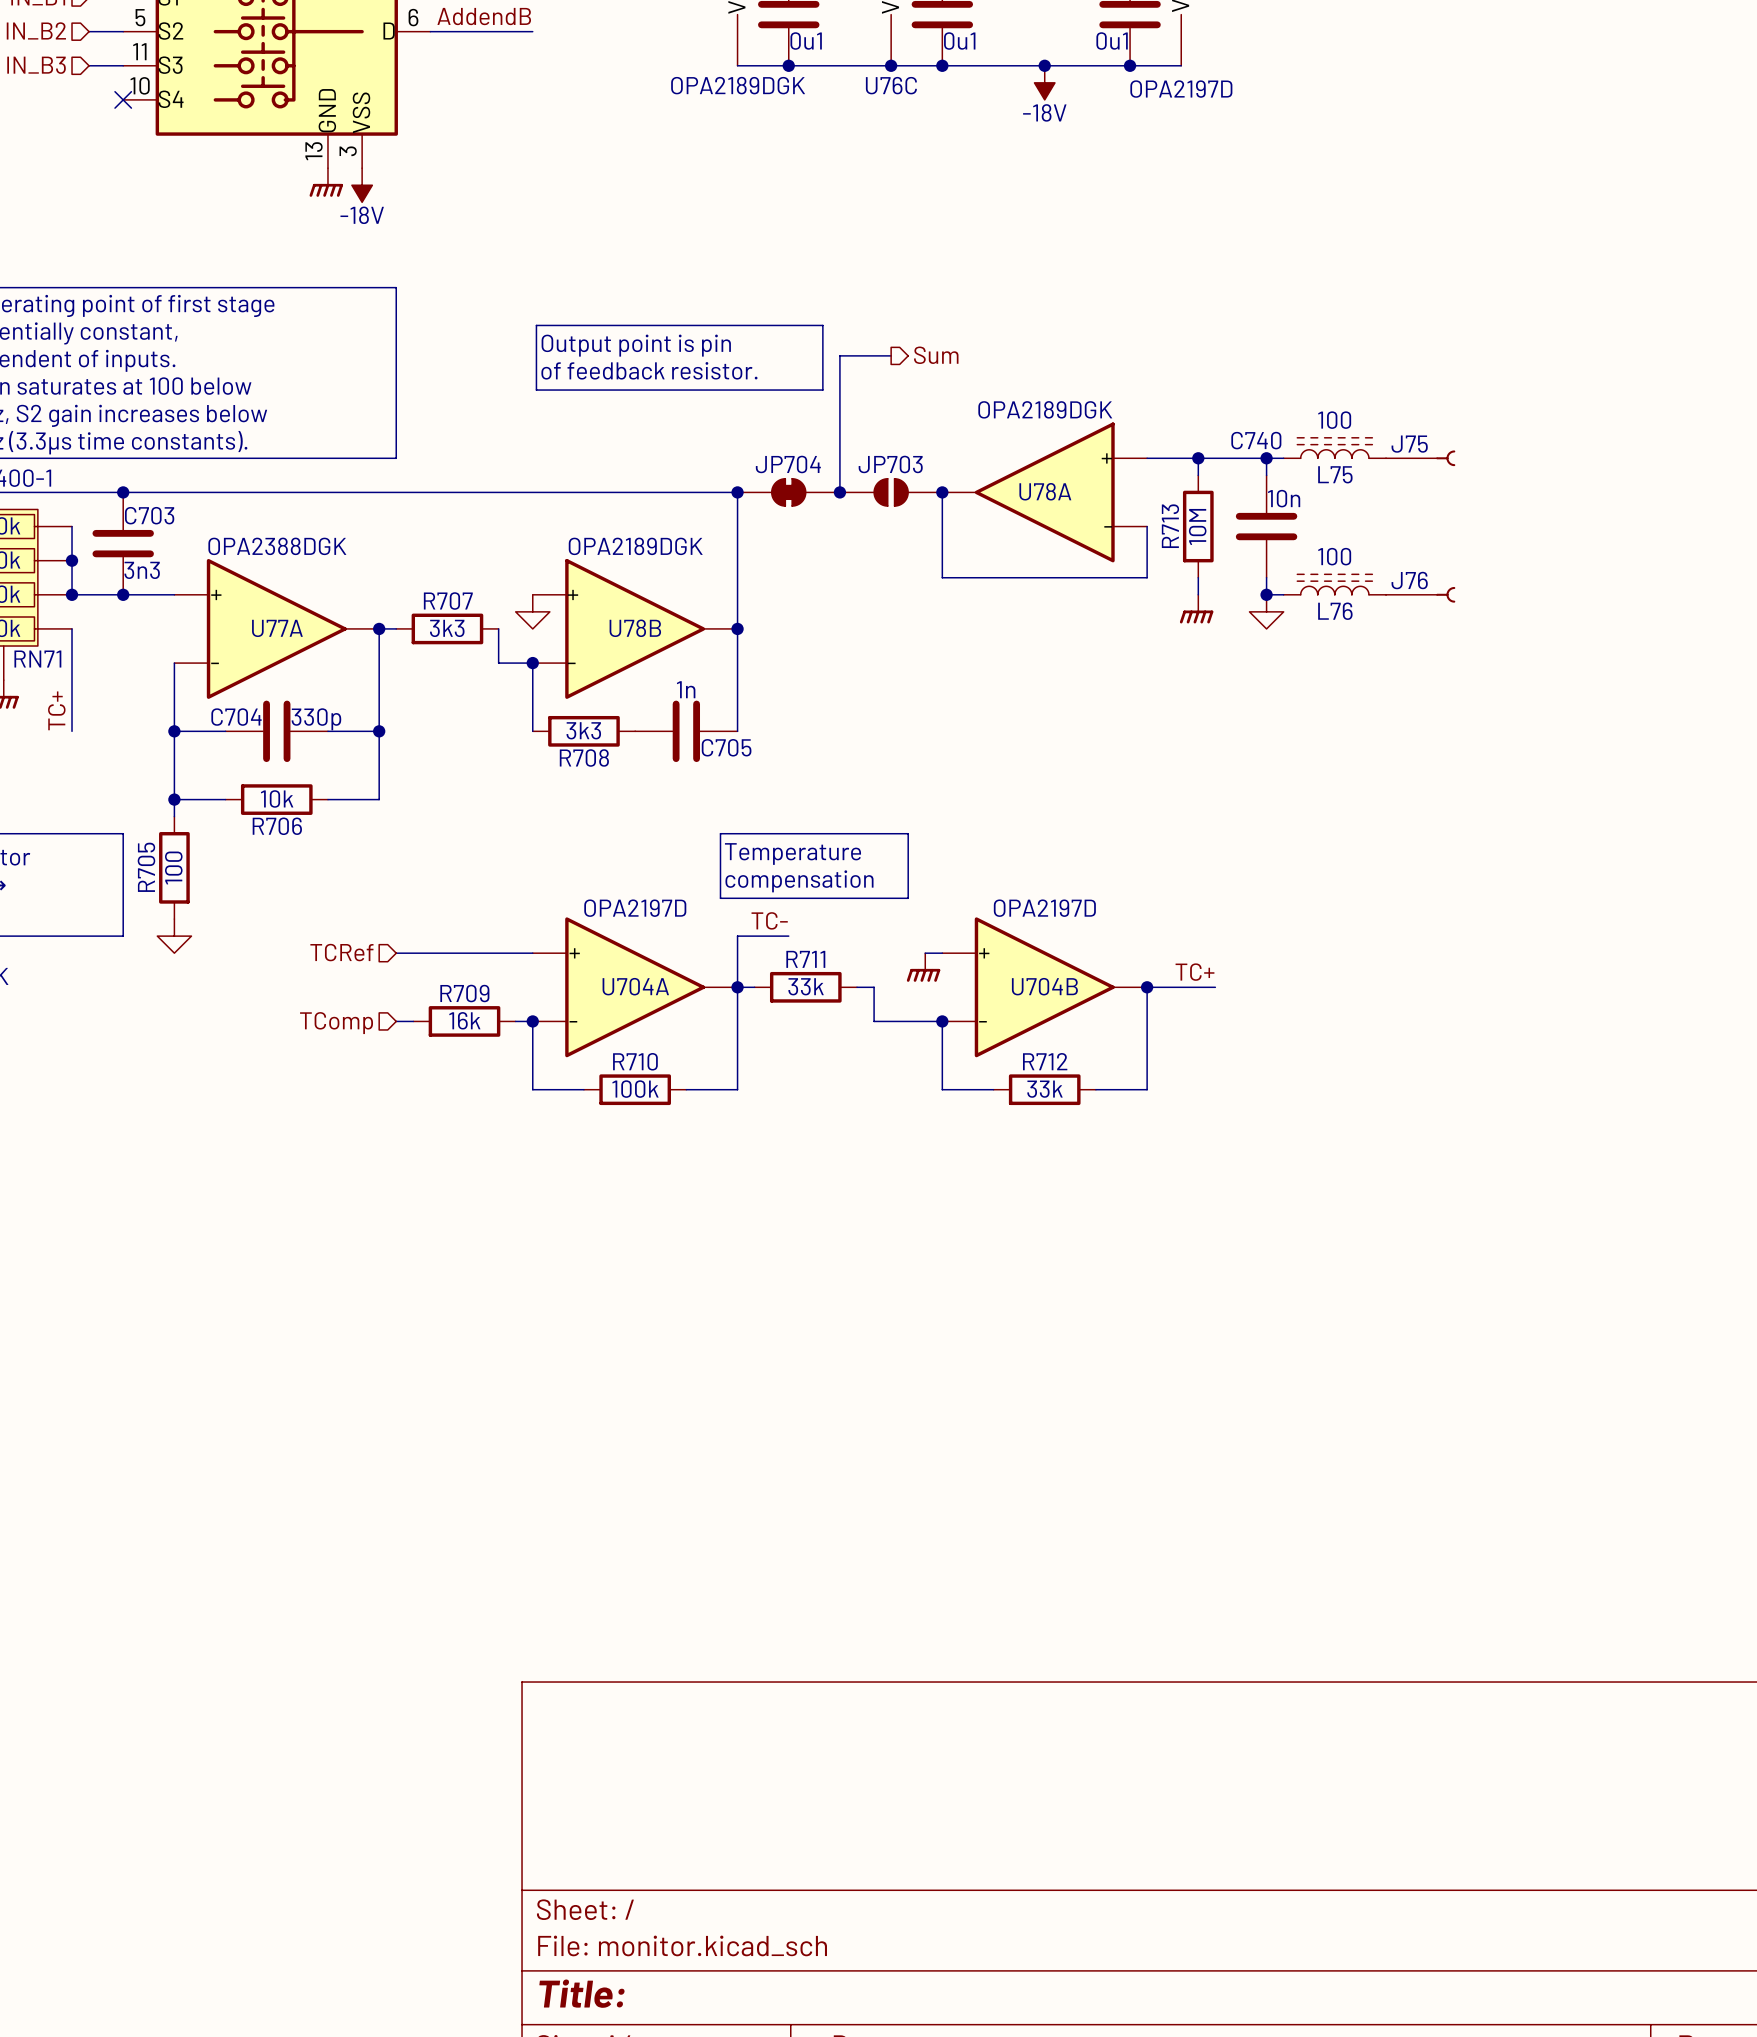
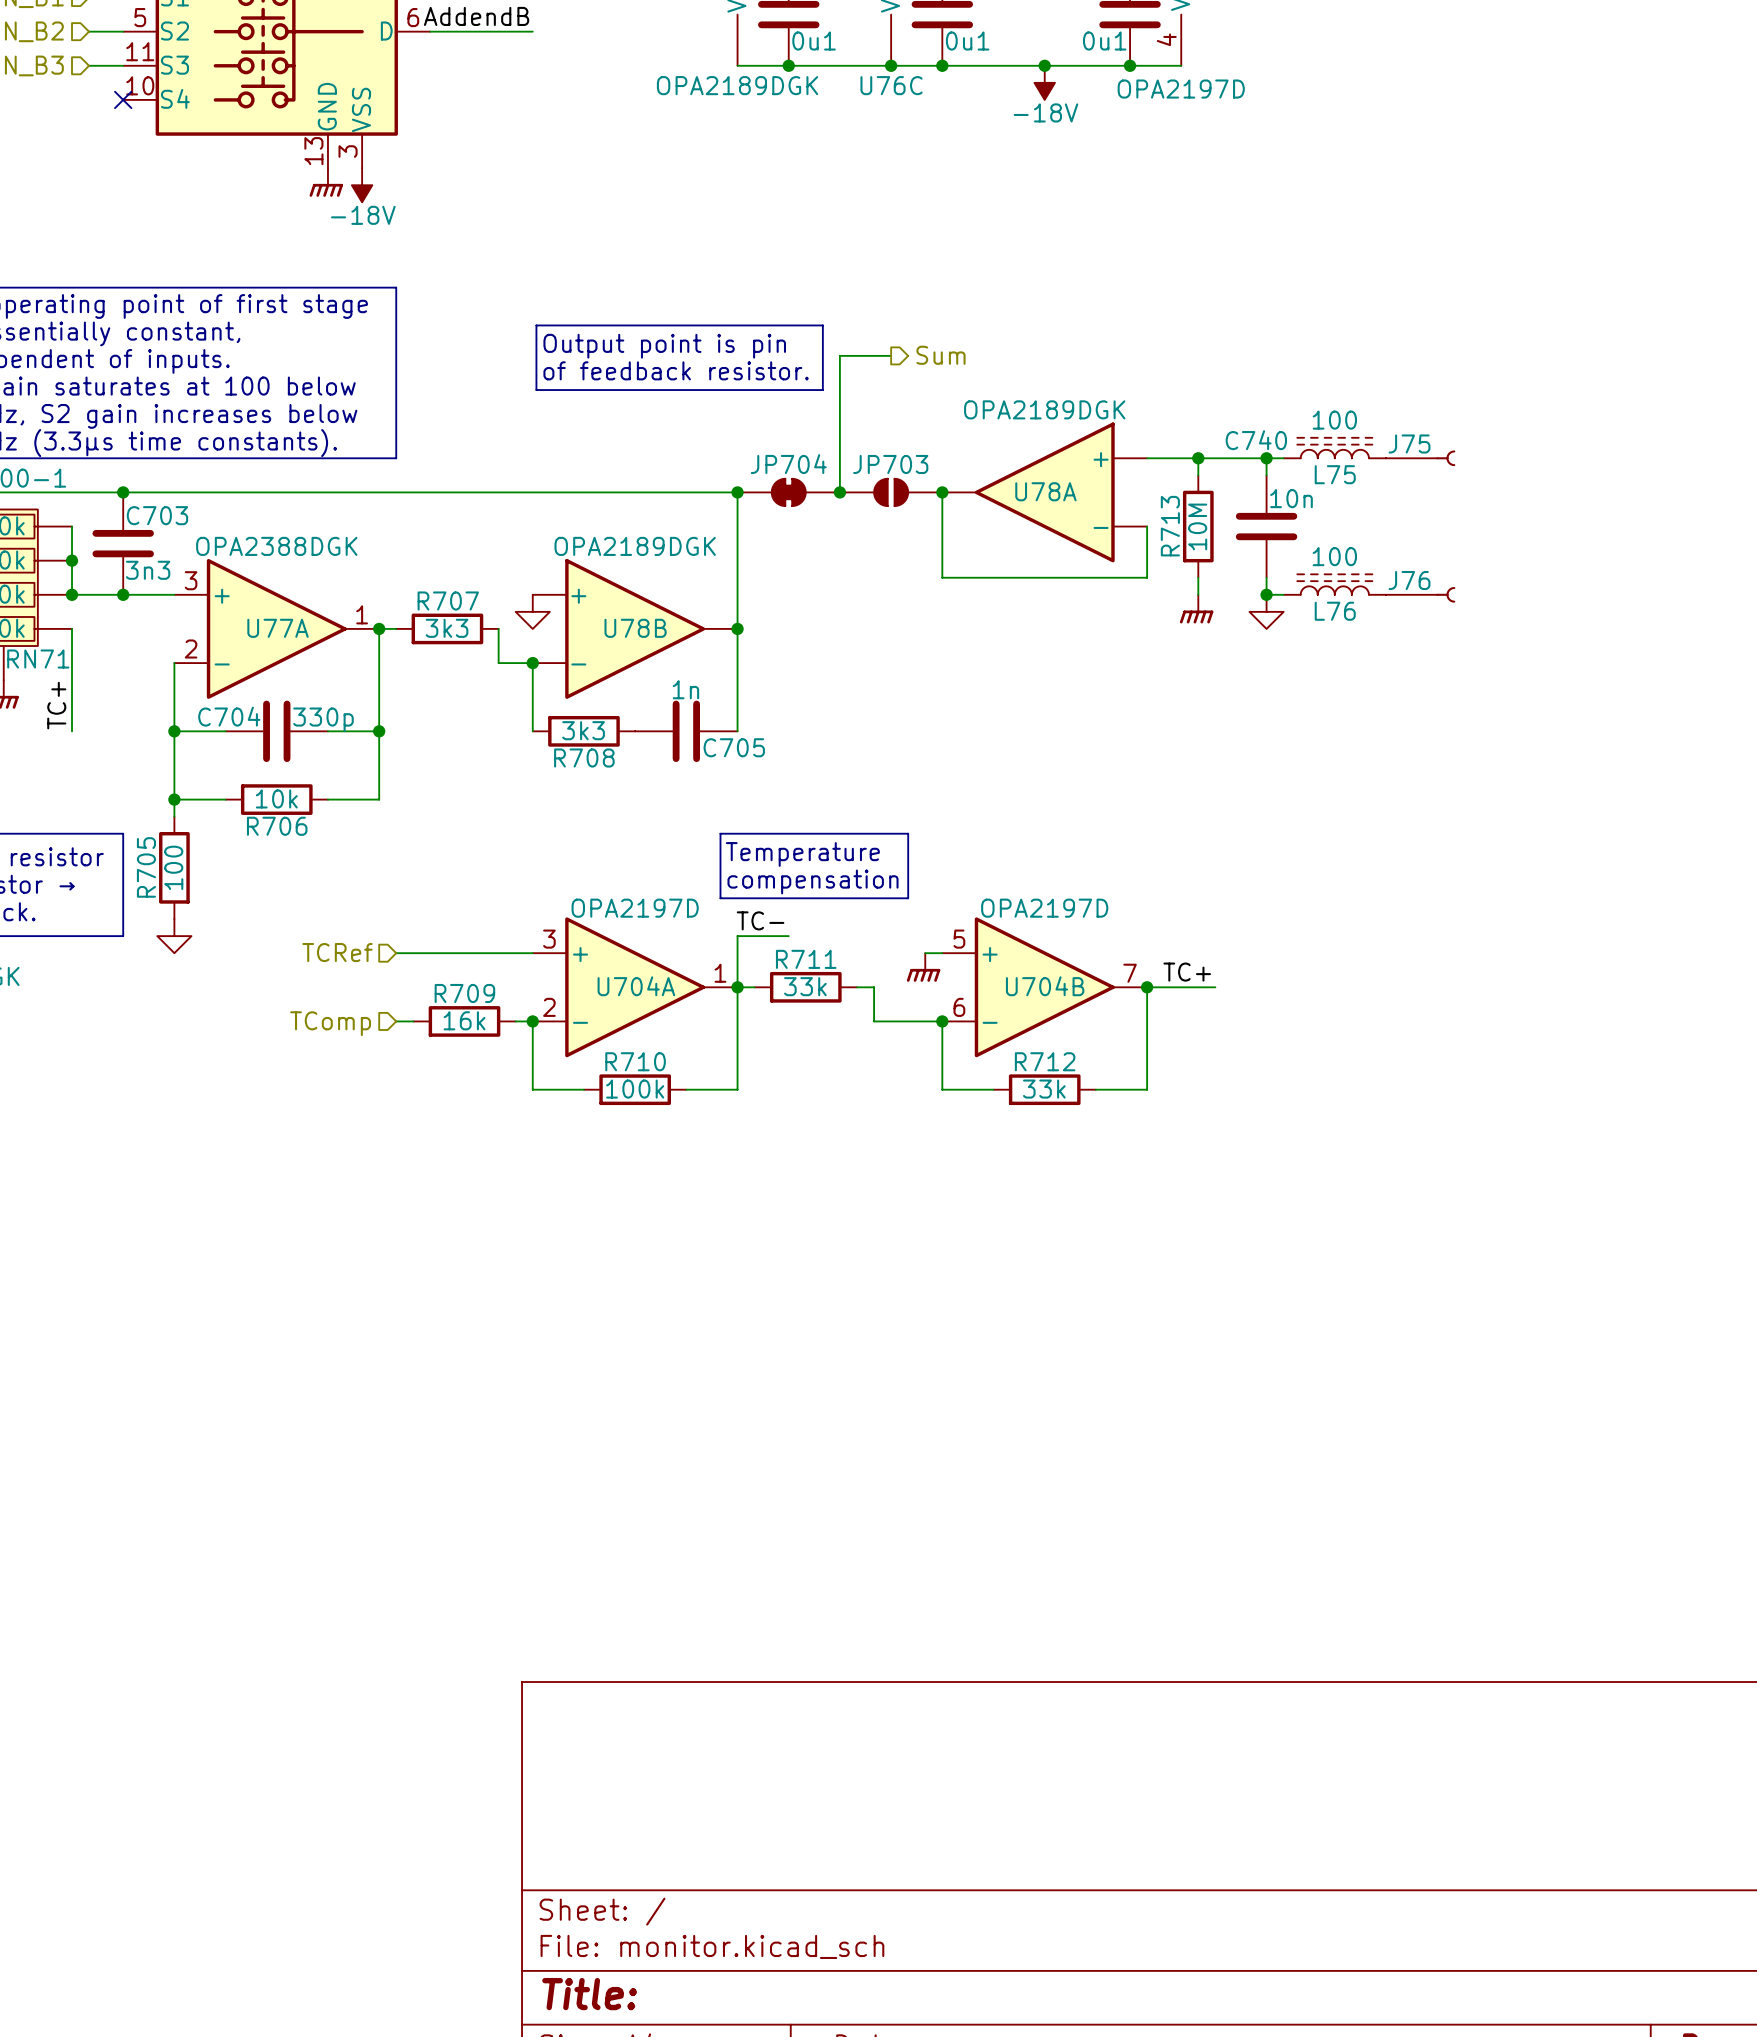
part pin number: none -> 4 (1166, 39)
U77A pin number: none -> 3 (191, 580)
U77A pin number: none -> 1 (362, 614)
U77A pin number: none -> 2 (191, 648)
U704A pin number: none -> 3 (549, 939)
U704B pin number: none -> 5 (959, 939)
U704A pin number: none -> 1 (720, 973)
U704B pin number: none -> 7 (1130, 973)
U704A pin number: none -> 2 (549, 1007)
U704B pin number: none -> 6 (959, 1007)

